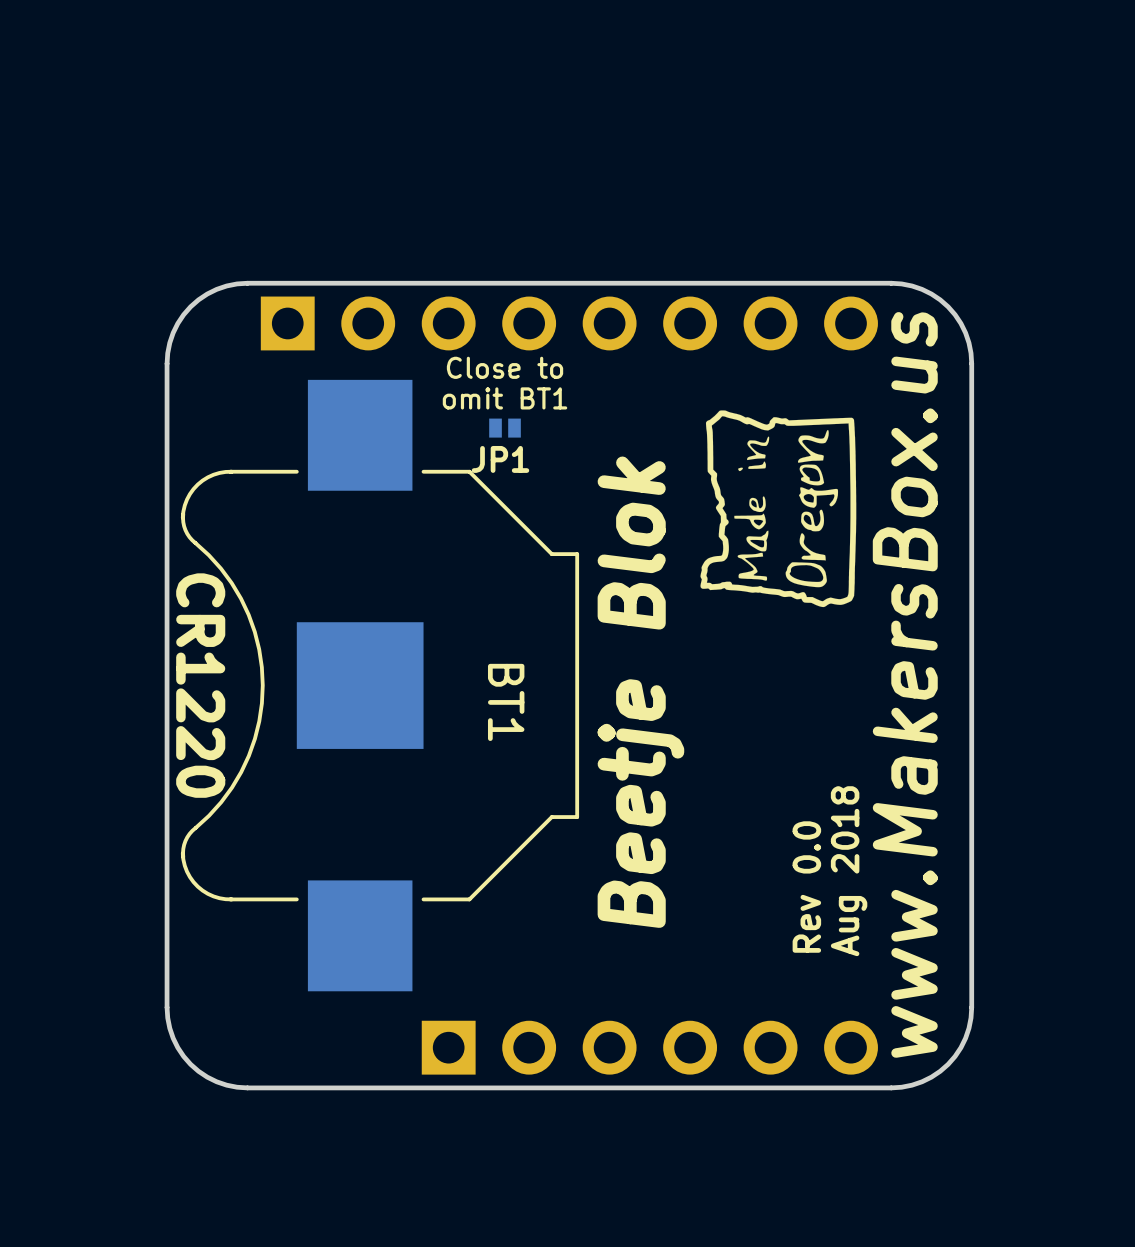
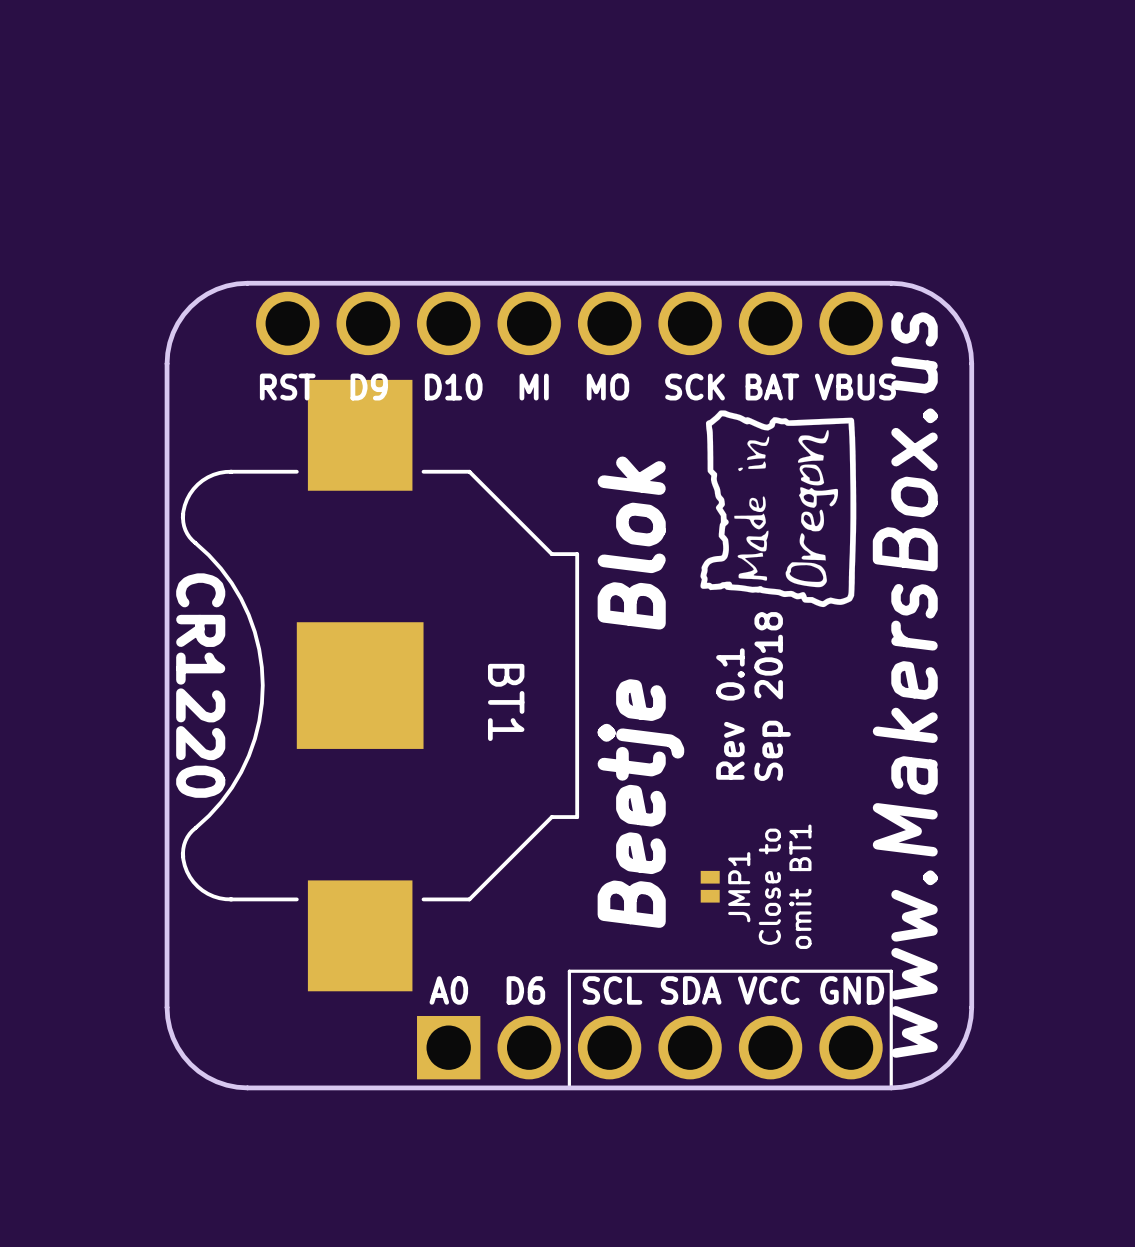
part footprint: [260, 296, 878, 351] -> [256, 291, 883, 356]
text rotation: 0° (505, 367) -> 90° counterclockwise (769, 886)
text position: Close to (505, 367) -> Close to (769, 886)
text rotation: 0° (505, 398) -> 90° counterclockwise (800, 886)
text position: omit BT1 (505, 398) -> omit BT1 (800, 886)
JP1: (505, 428) -> none
text: none -> Sep 2018 (772, 696)
text: none -> Rev 0.1 (730, 714)
text: Aug 2018 (849, 871) -> none
part: none -> (710, 886)
text: none -> JMP1 (739, 887)
text: Rev 0.0 (806, 887) -> none
part footprint: [421, 1020, 878, 1075] -> [417, 969, 893, 1090]

